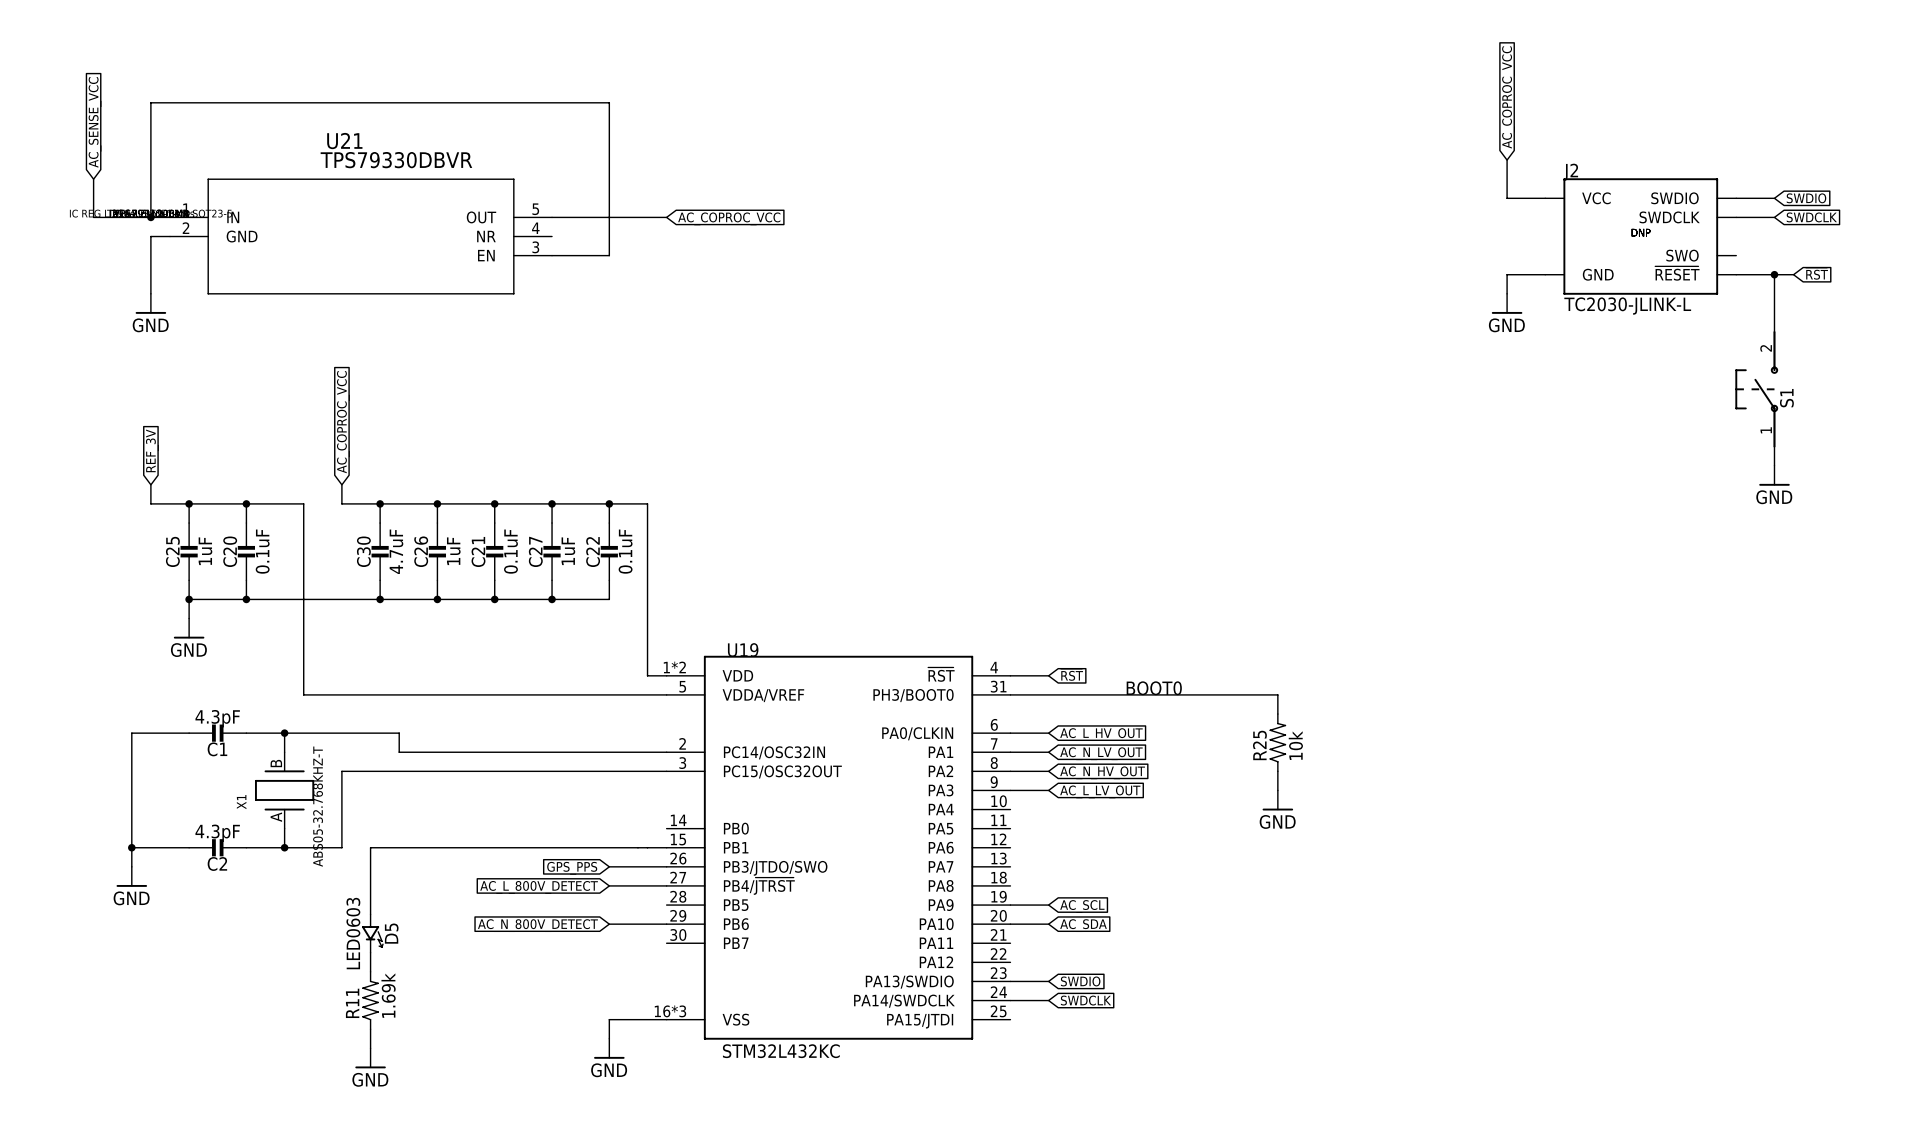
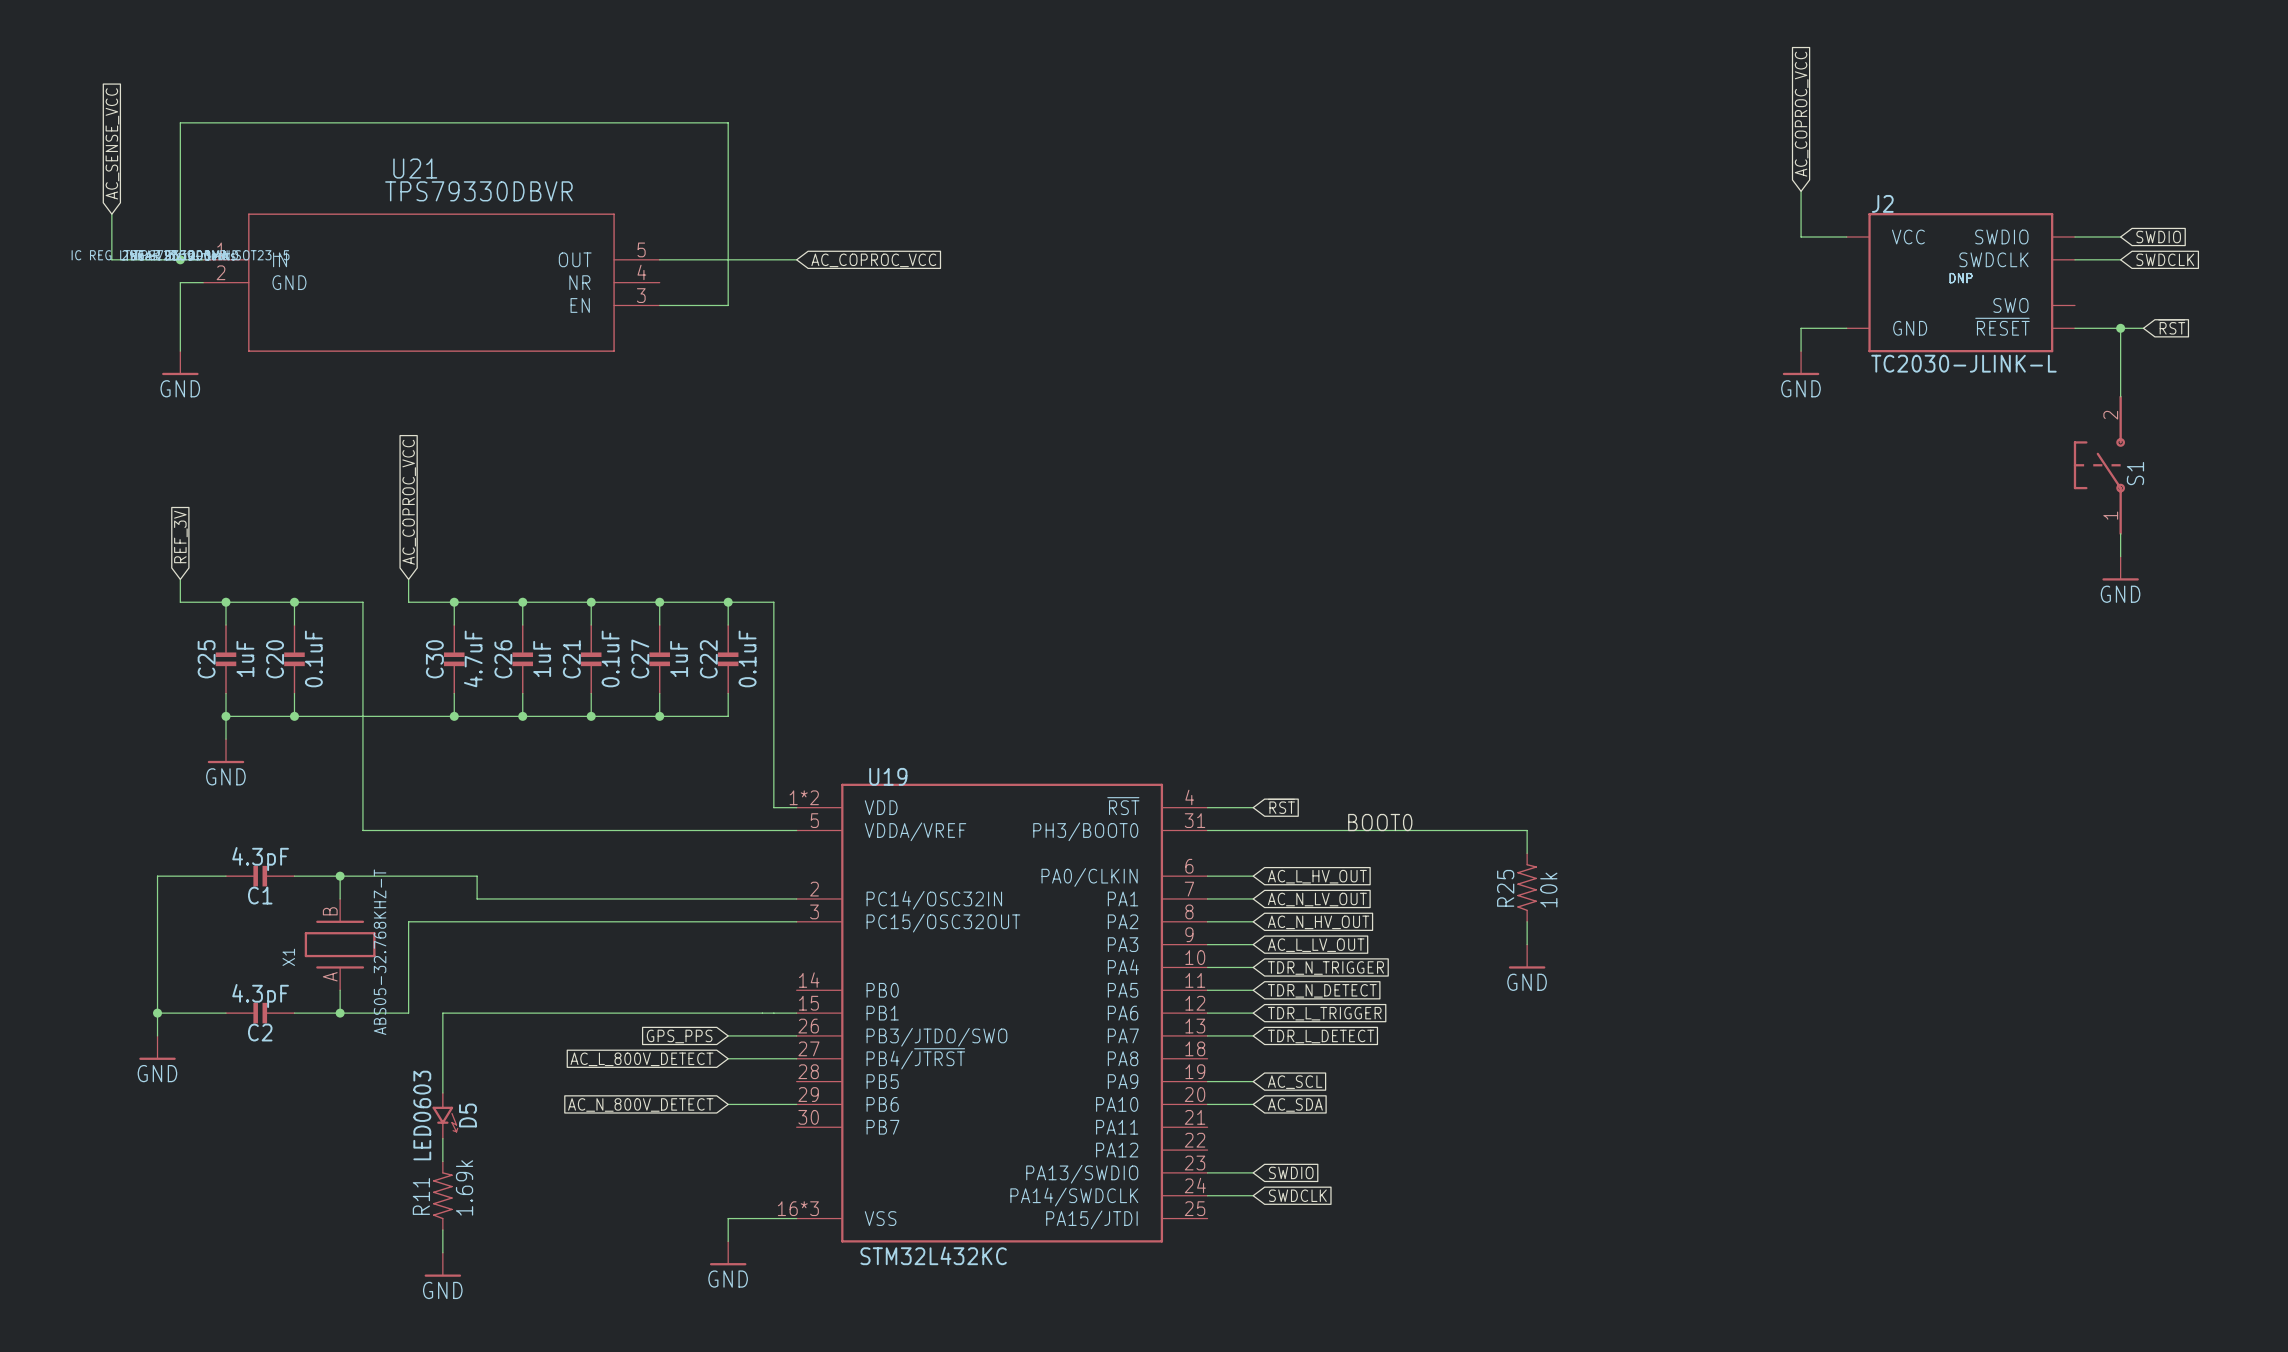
wire: none -> (1207, 967) (1253, 967)
global label: none -> TDR_N_TRIGGER (1325, 968)
wire: none -> (1207, 990) (1253, 990)
global label: none -> TDR_N_DETECT (1322, 990)
wire: none -> (1207, 1013) (1253, 1013)
global label: none -> TDR_L_TRIGGER (1324, 1013)
wire: none -> (1207, 1035) (1253, 1035)
global label: none -> TDR_L_DETECT (1321, 1036)

